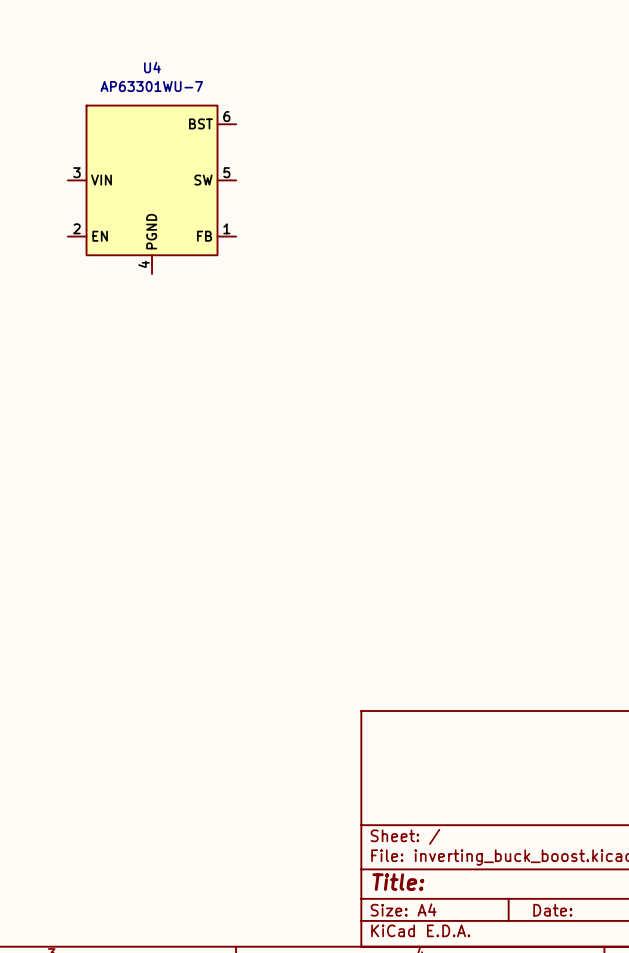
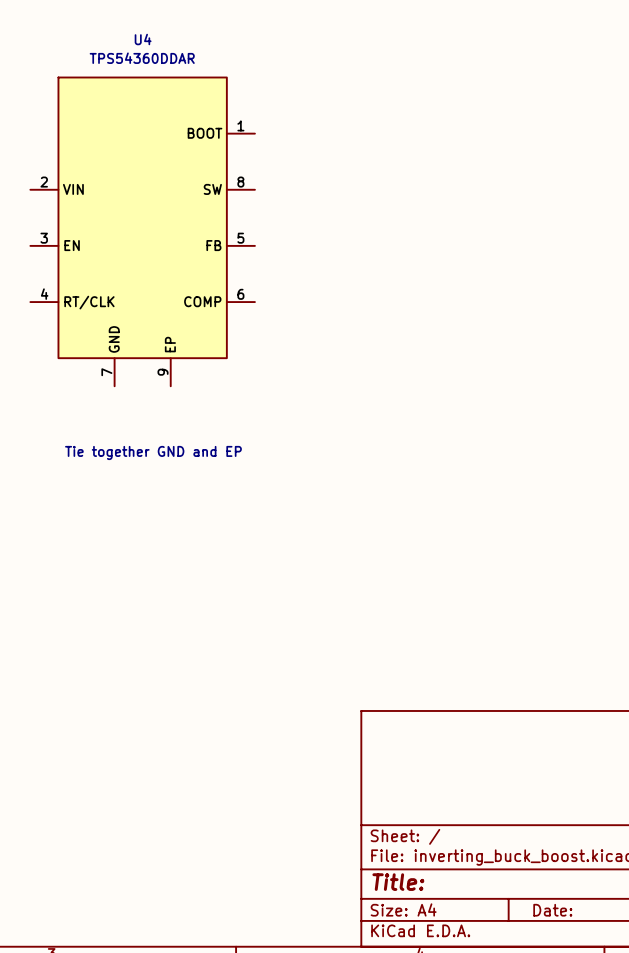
U4 name position: U4 (152, 67) -> U4 (143, 39)
U4 value: AP63301WU-7 (151, 86) -> TPS54360DDAR (142, 58)
U4 symbol: [67, 105, 237, 274] -> [30, 77, 255, 387]
text: none -> Tie together GND and EP (153, 452)

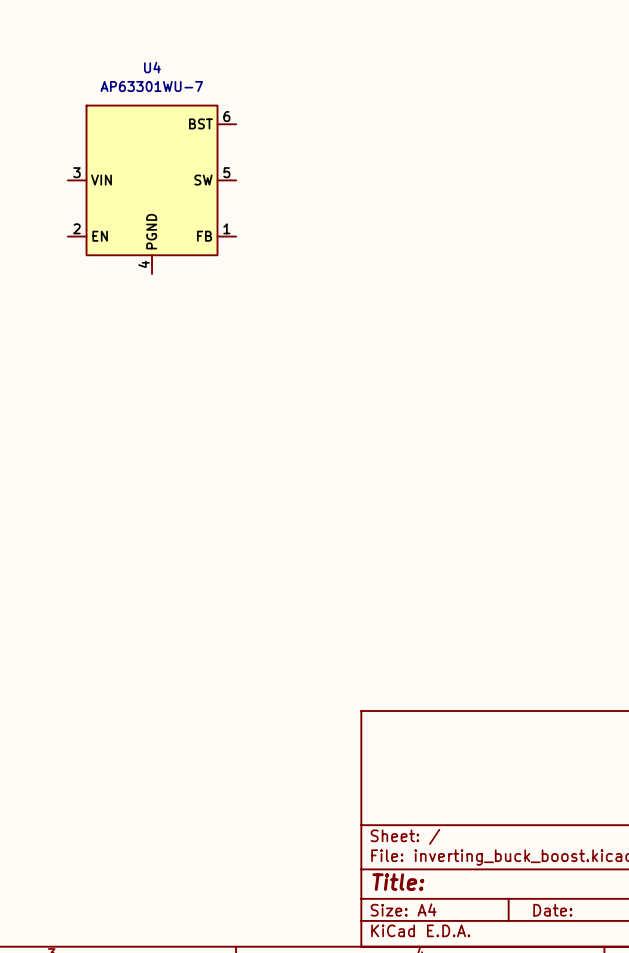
U4 name position: U4 (143, 39) -> U4 (152, 67)
U4 value: TPS54360DDAR (142, 58) -> AP63301WU-7 (151, 86)
U4 symbol: [30, 77, 255, 387] -> [67, 105, 237, 274]
text: Tie together GND and EP (153, 452) -> none

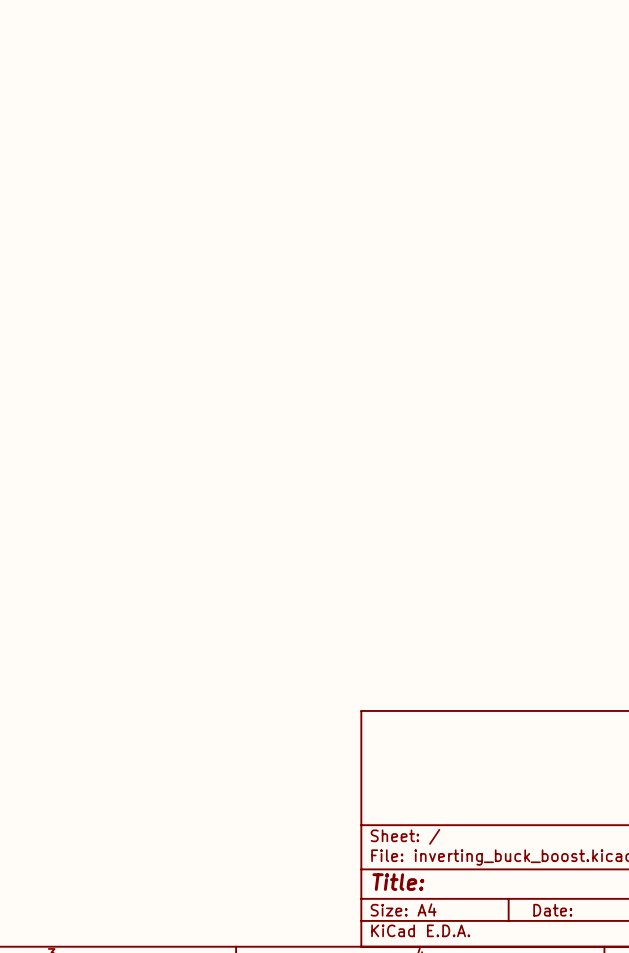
U4: AP63301WU-7 (152, 189) -> none

